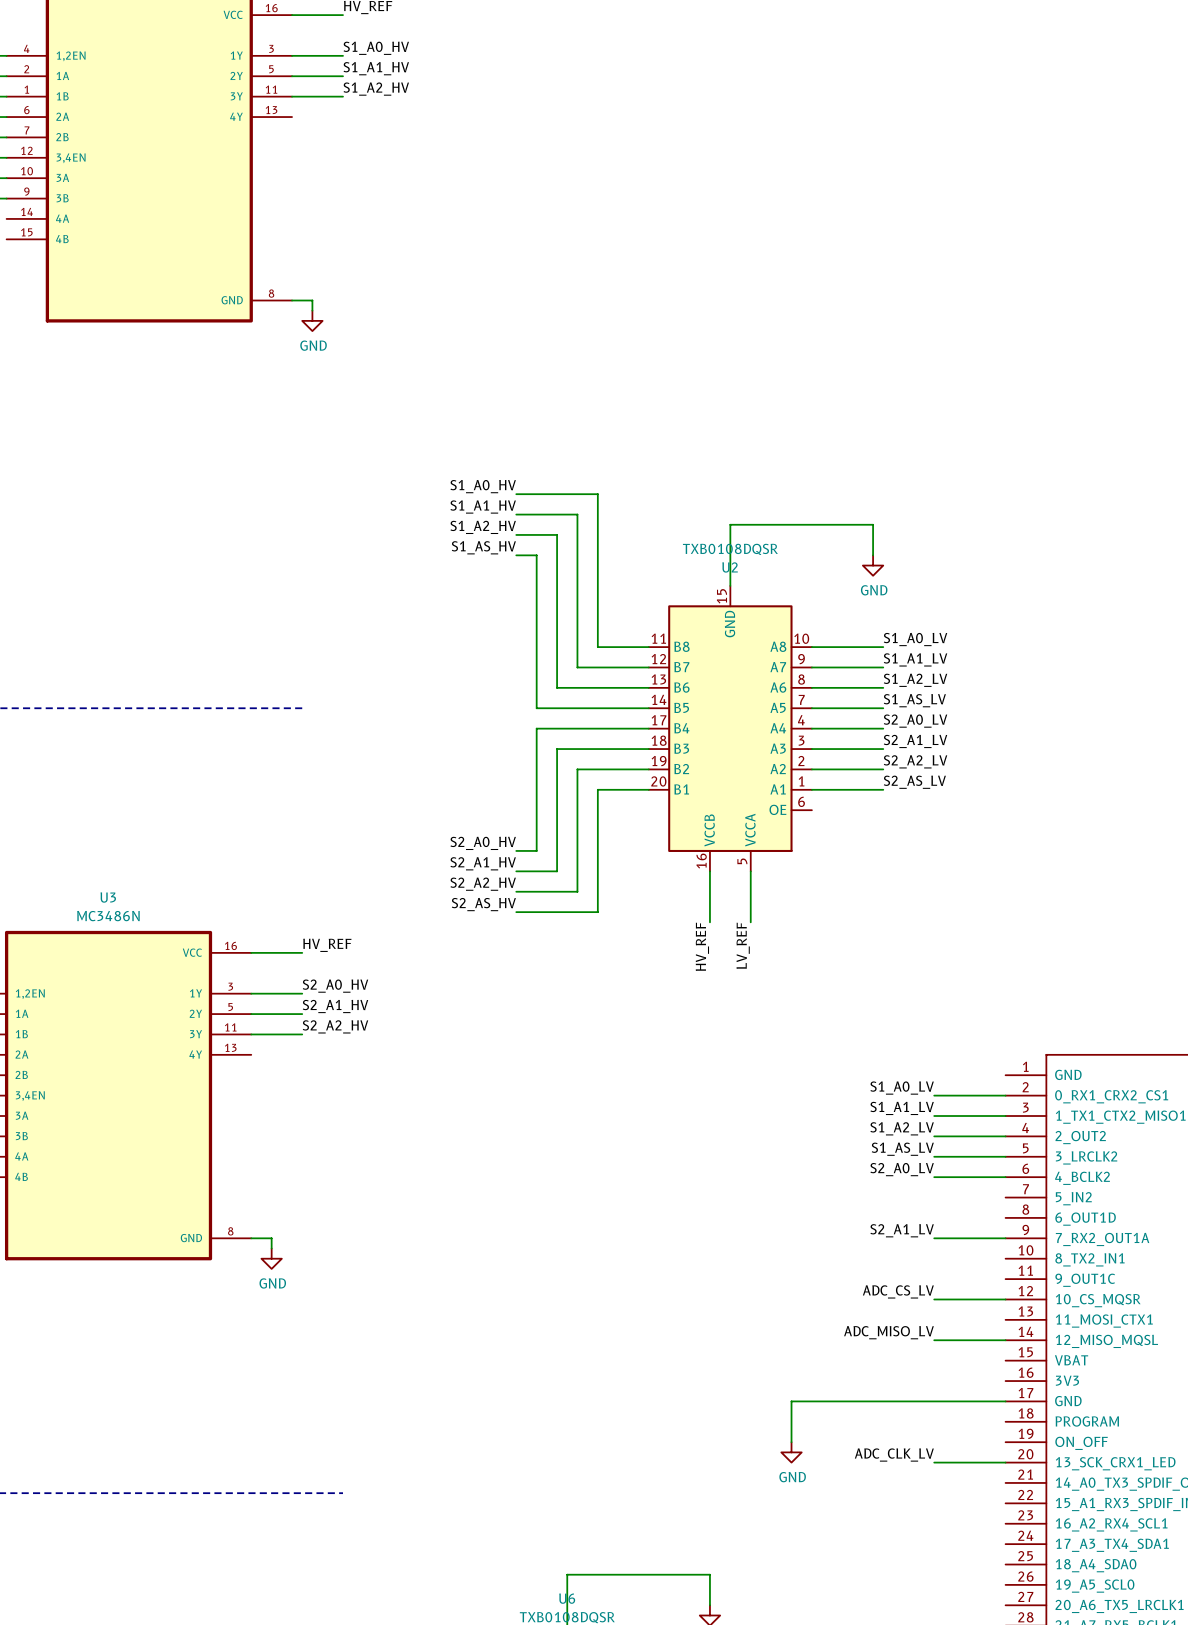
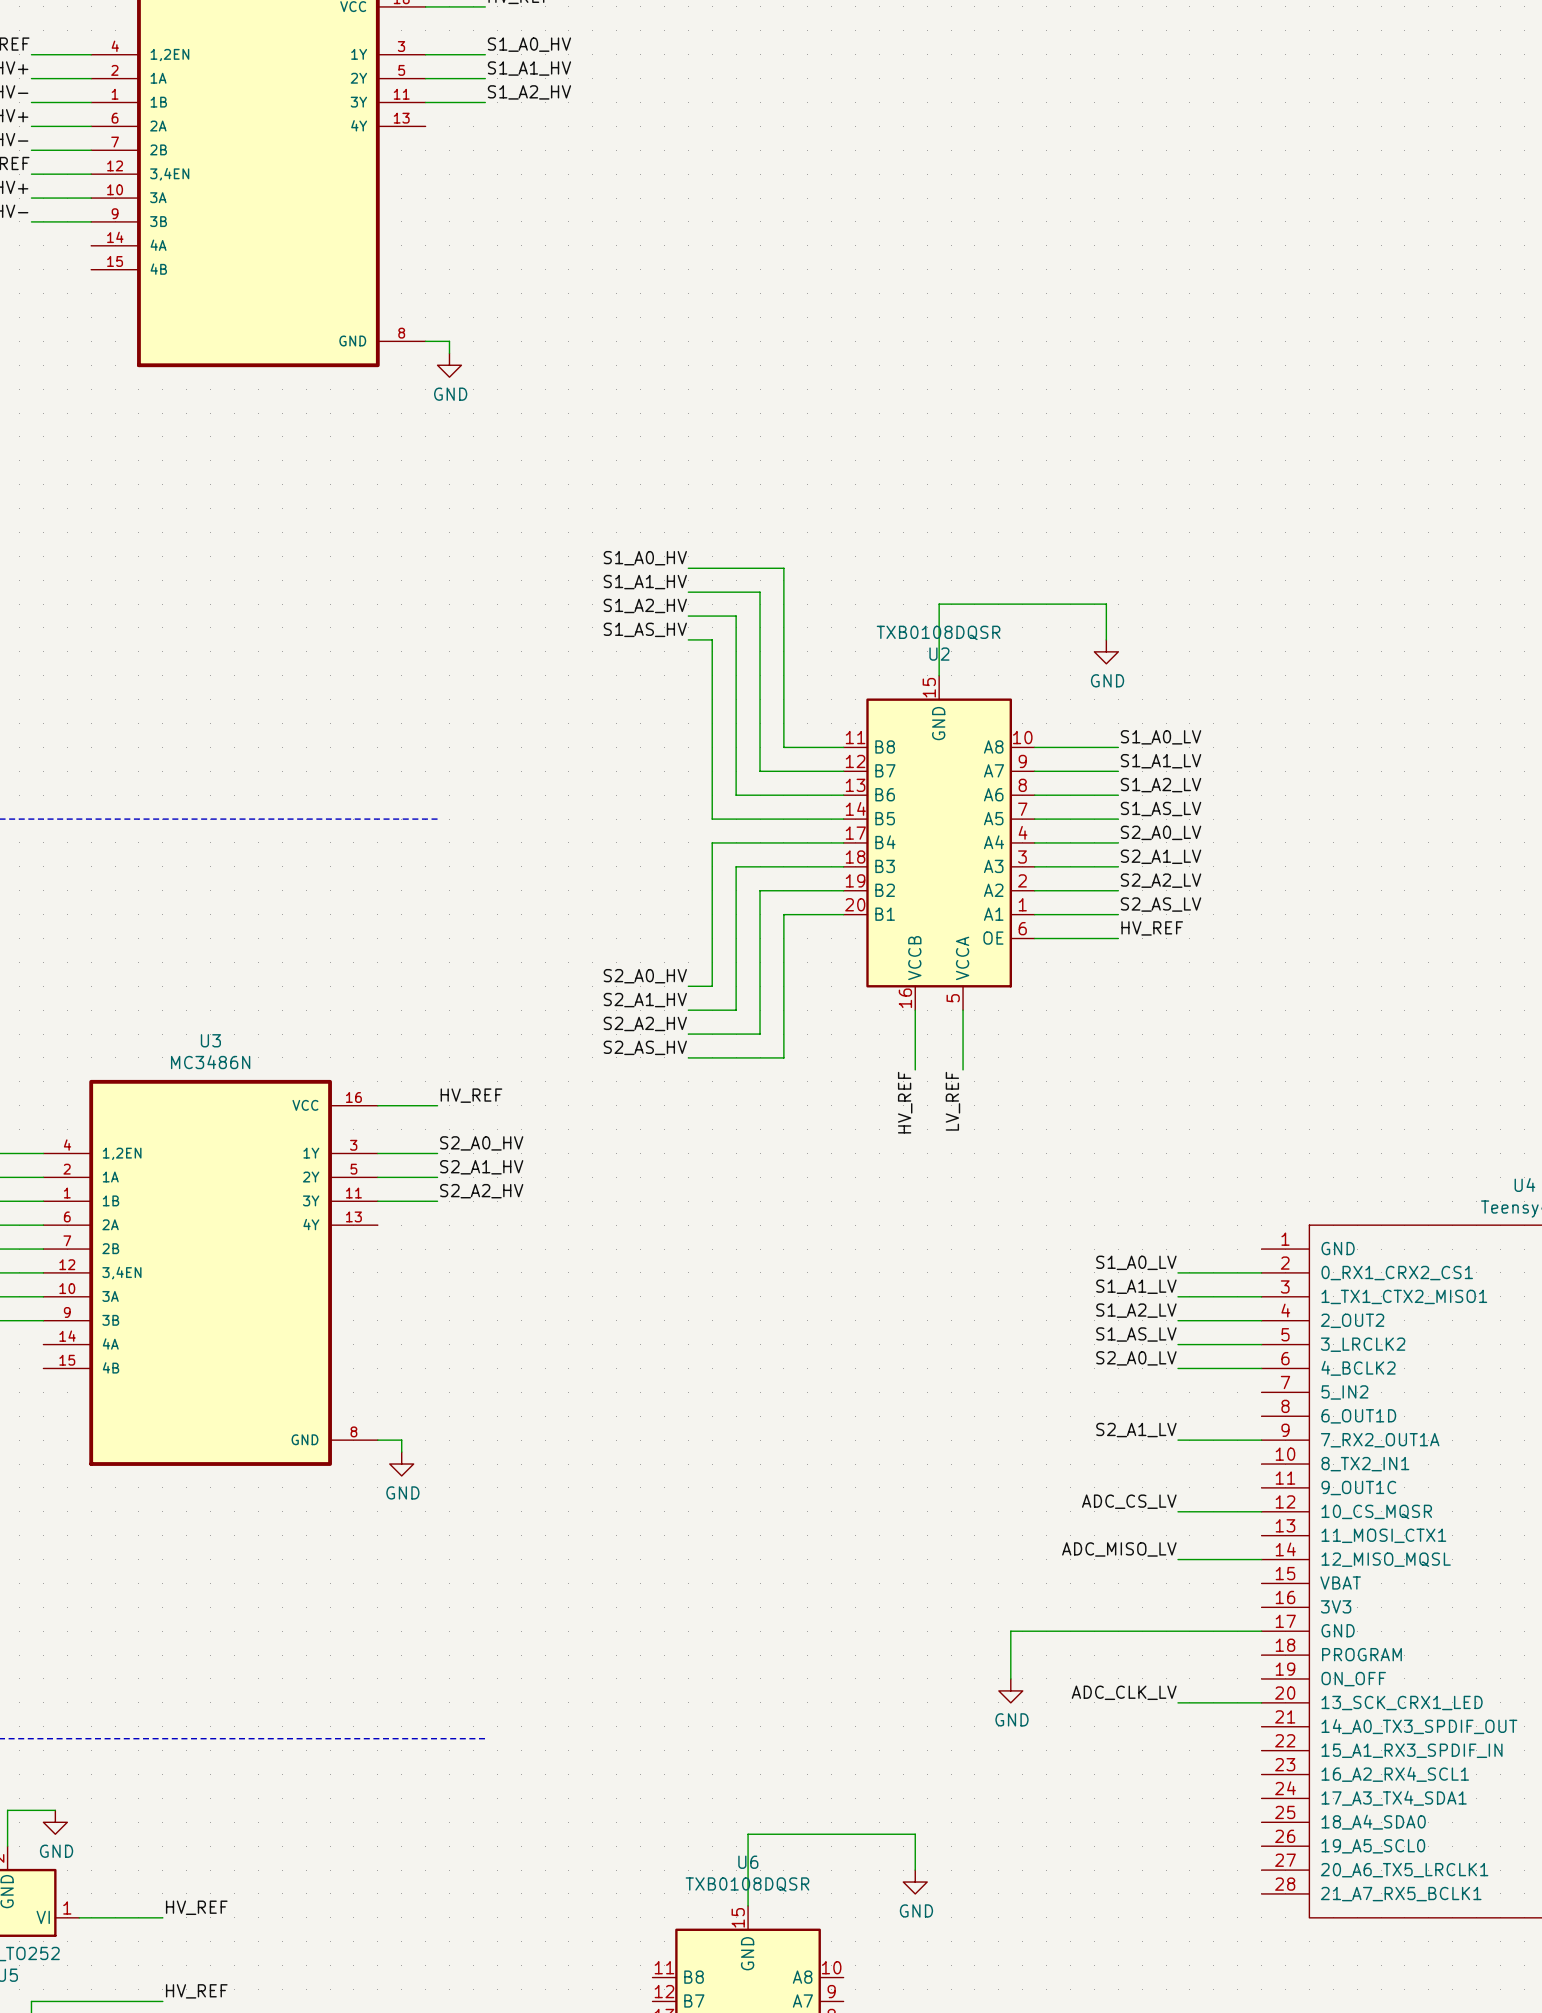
label: none -> HV_REF (1152, 928)
wire: none -> (1034, 938) (1118, 938)

